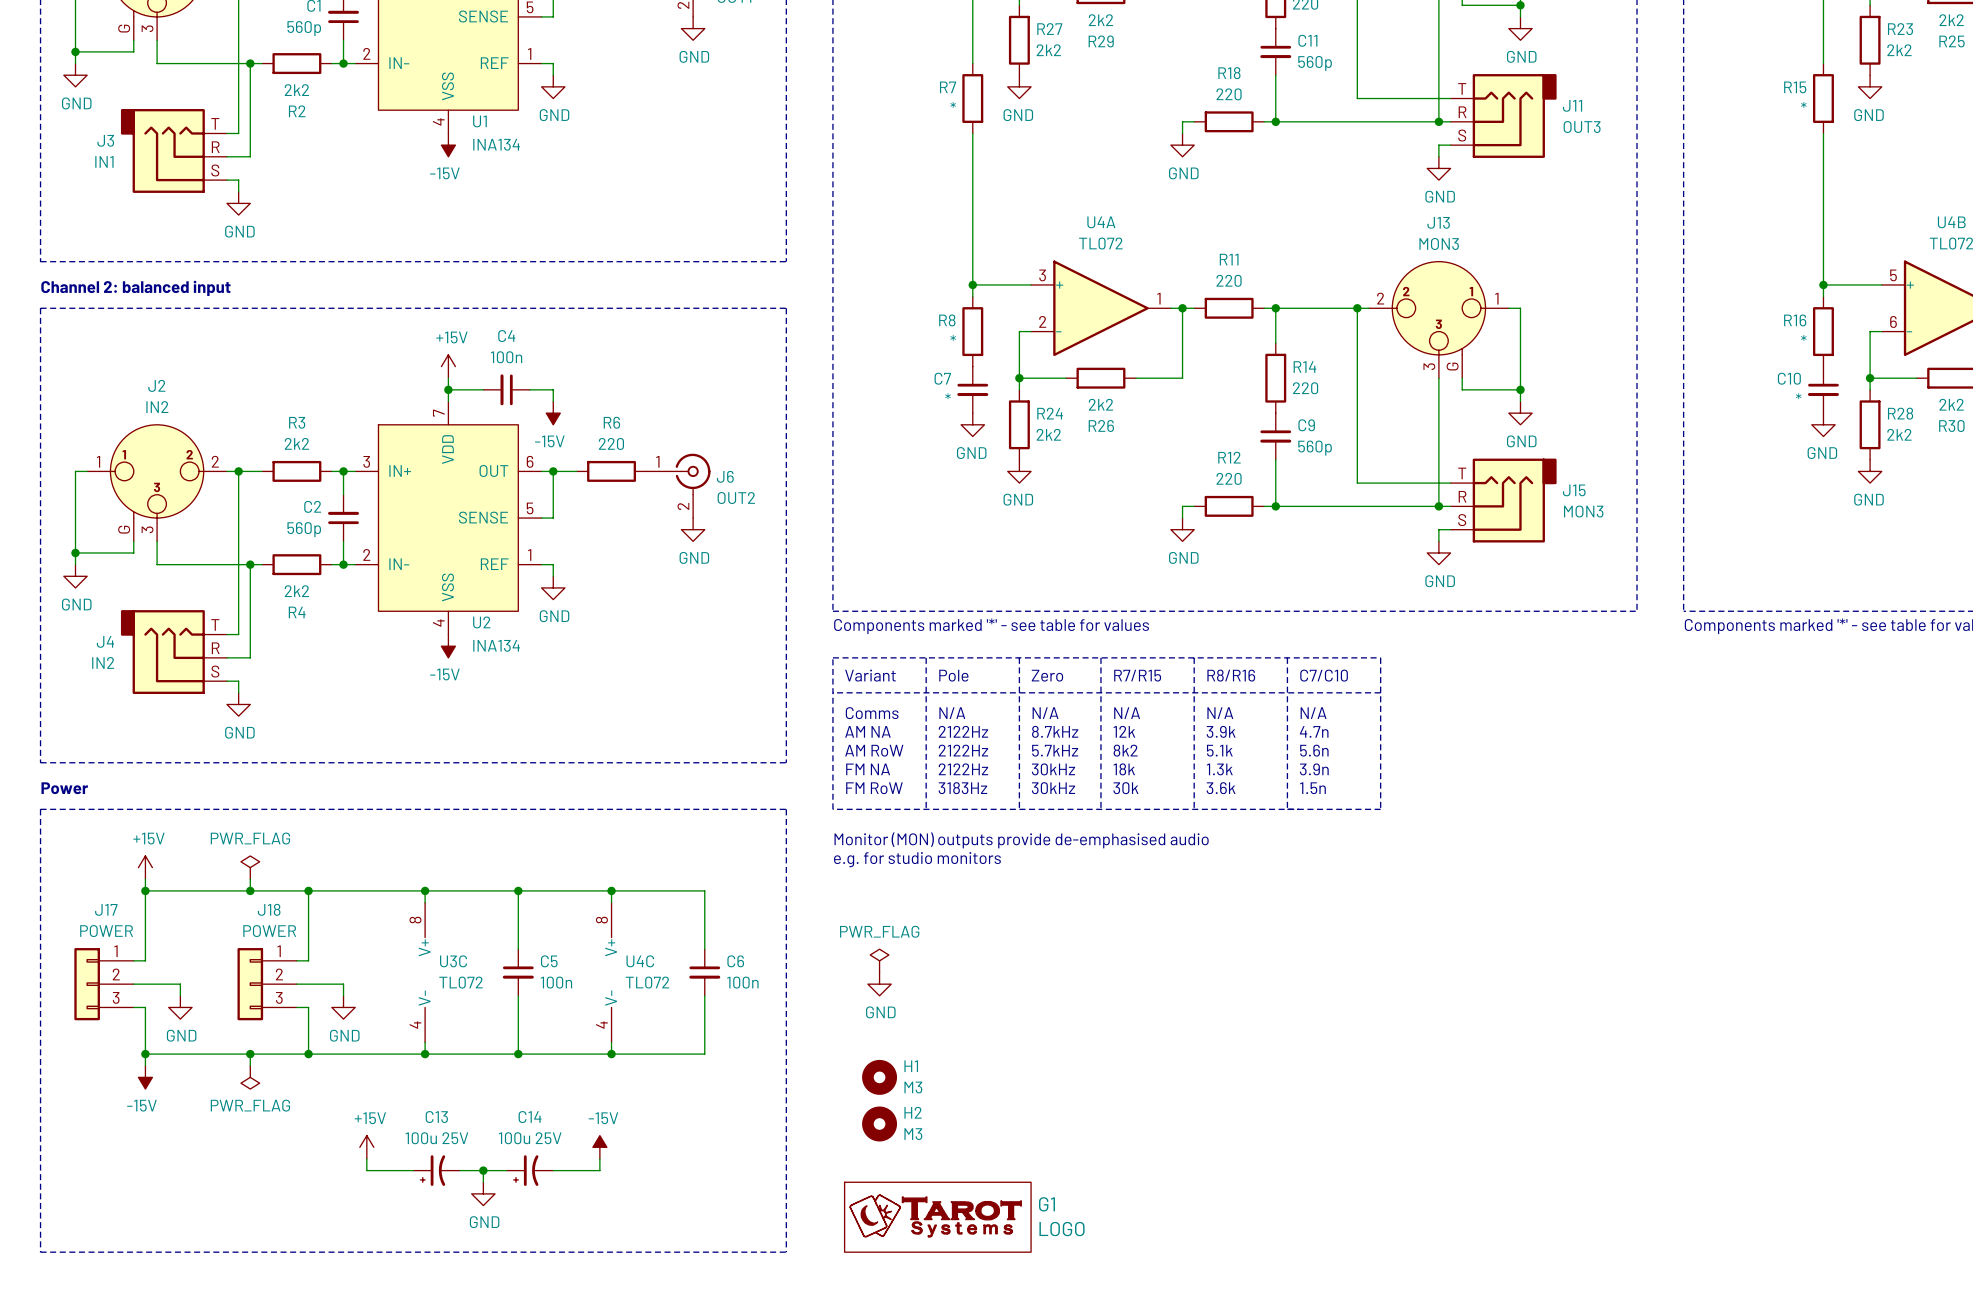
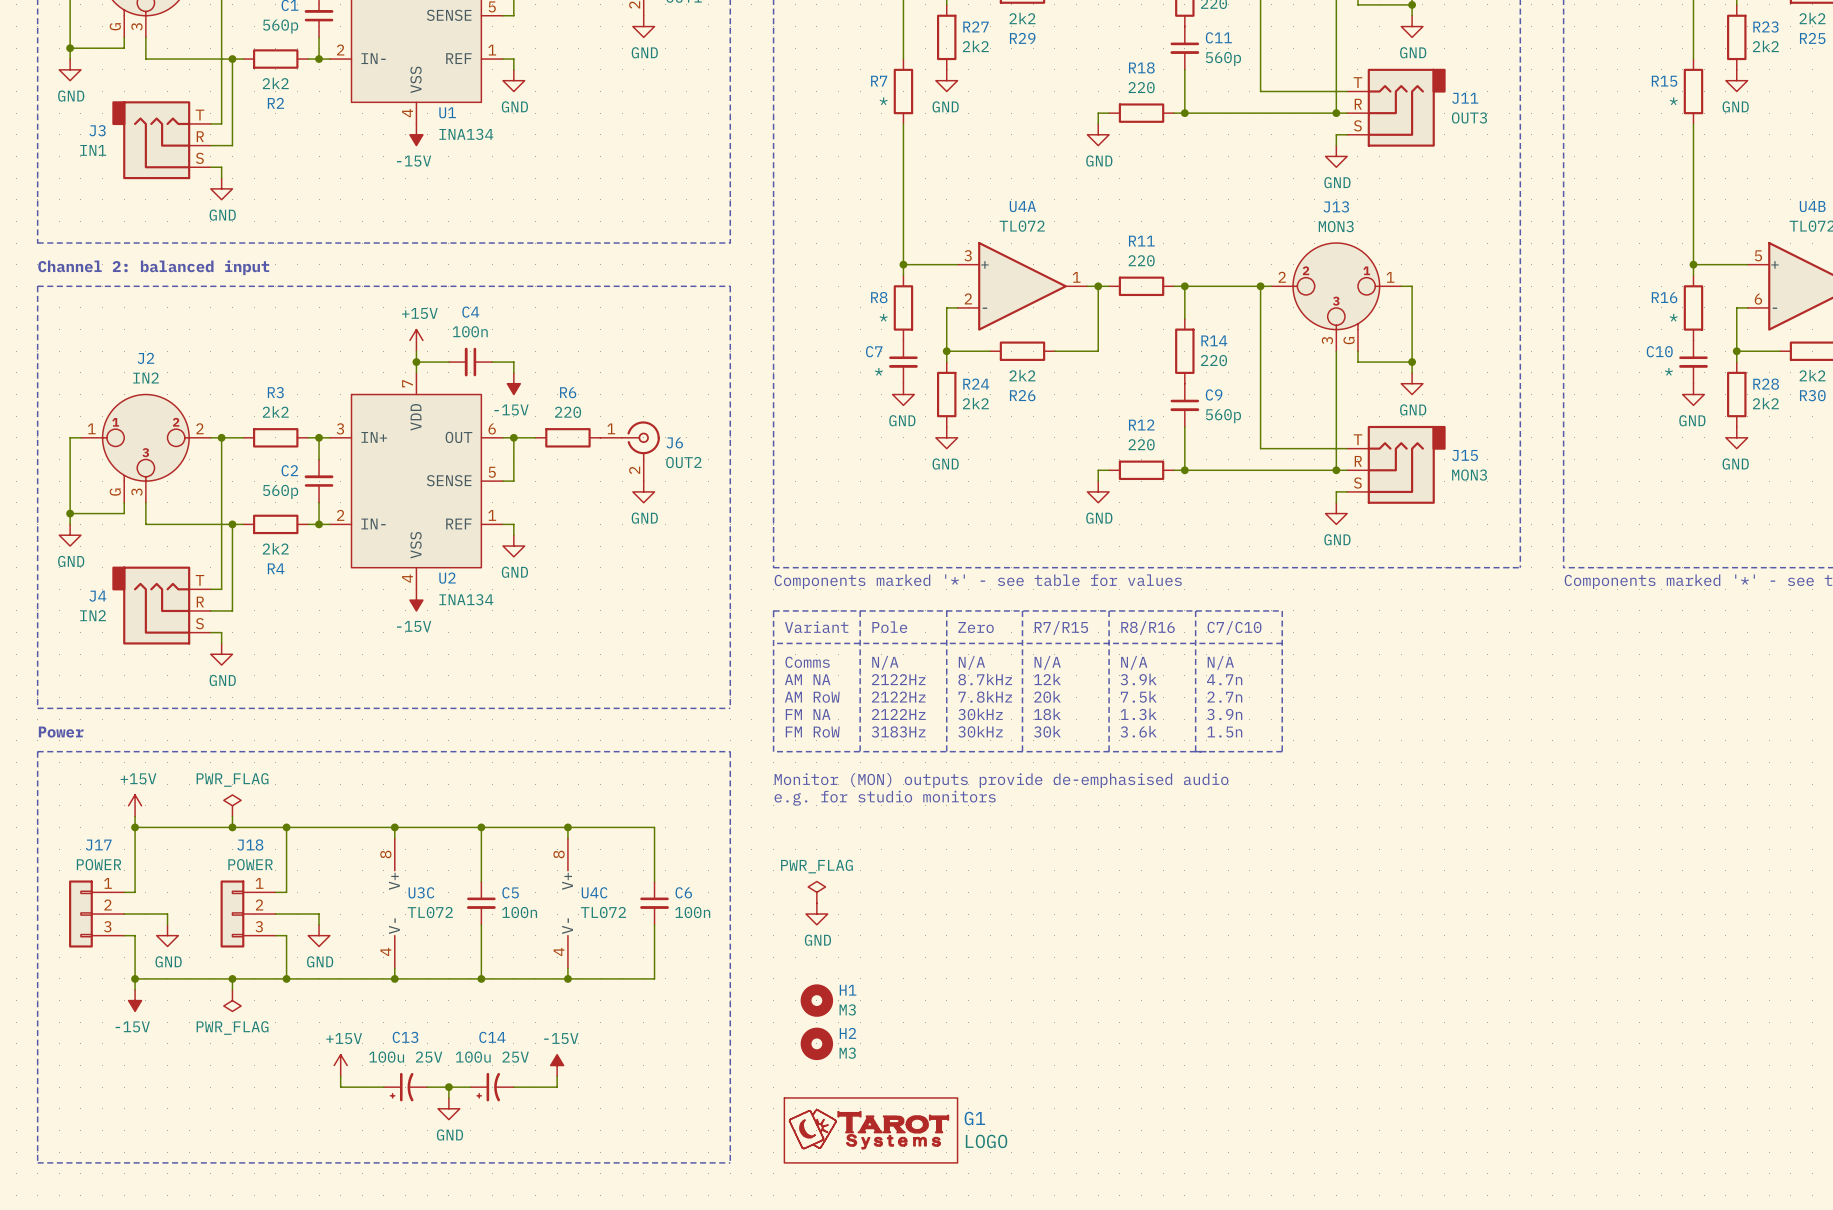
text: 5.7kHz (1055, 750) -> 7.8kHz (985, 696)
text: 8k2 (1125, 750) -> 20k (1047, 696)
text: 5.1k (1219, 750) -> 7.5k (1138, 696)
text: 5.6n (1314, 750) -> 2.7n (1224, 697)

